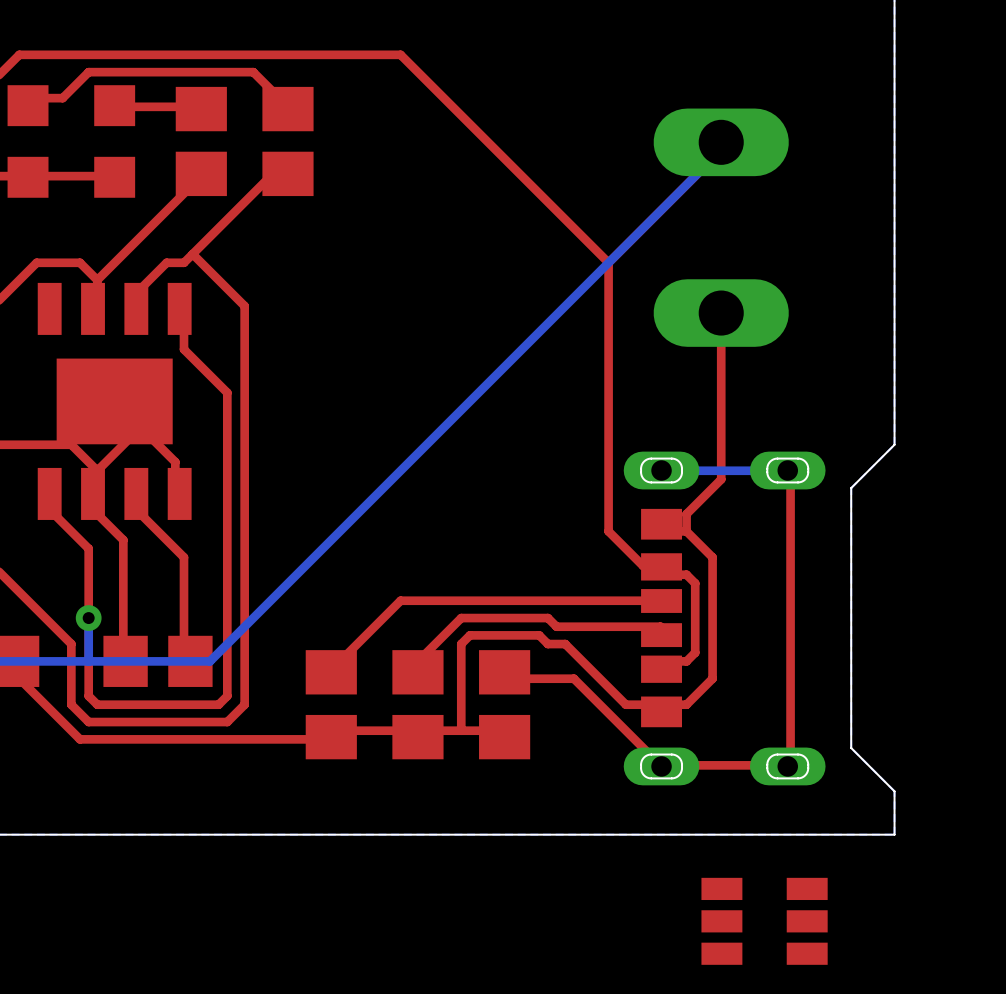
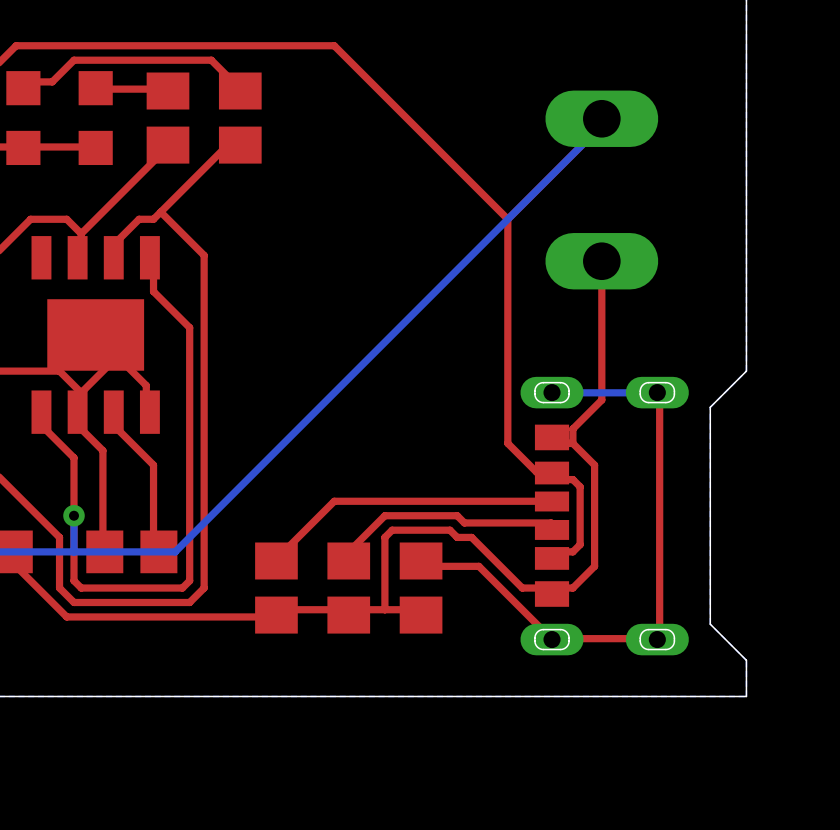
part: (764, 921) -> none

